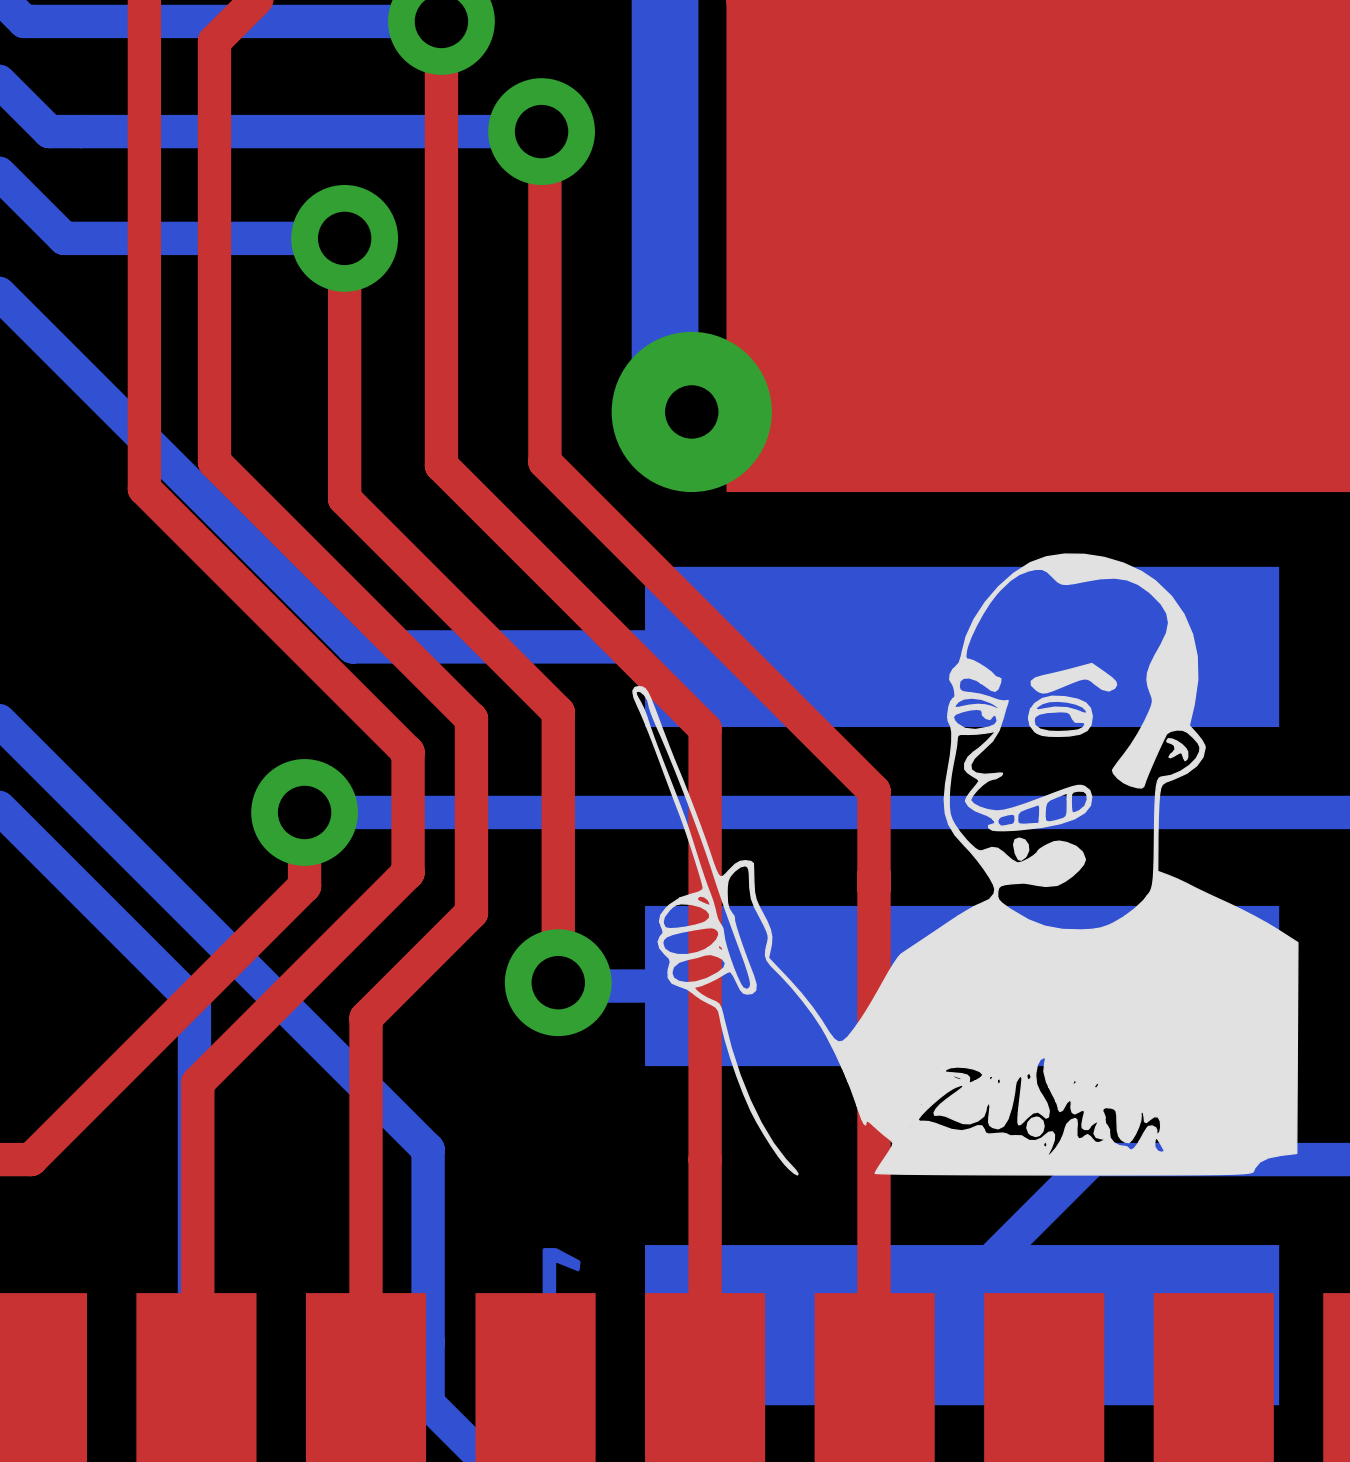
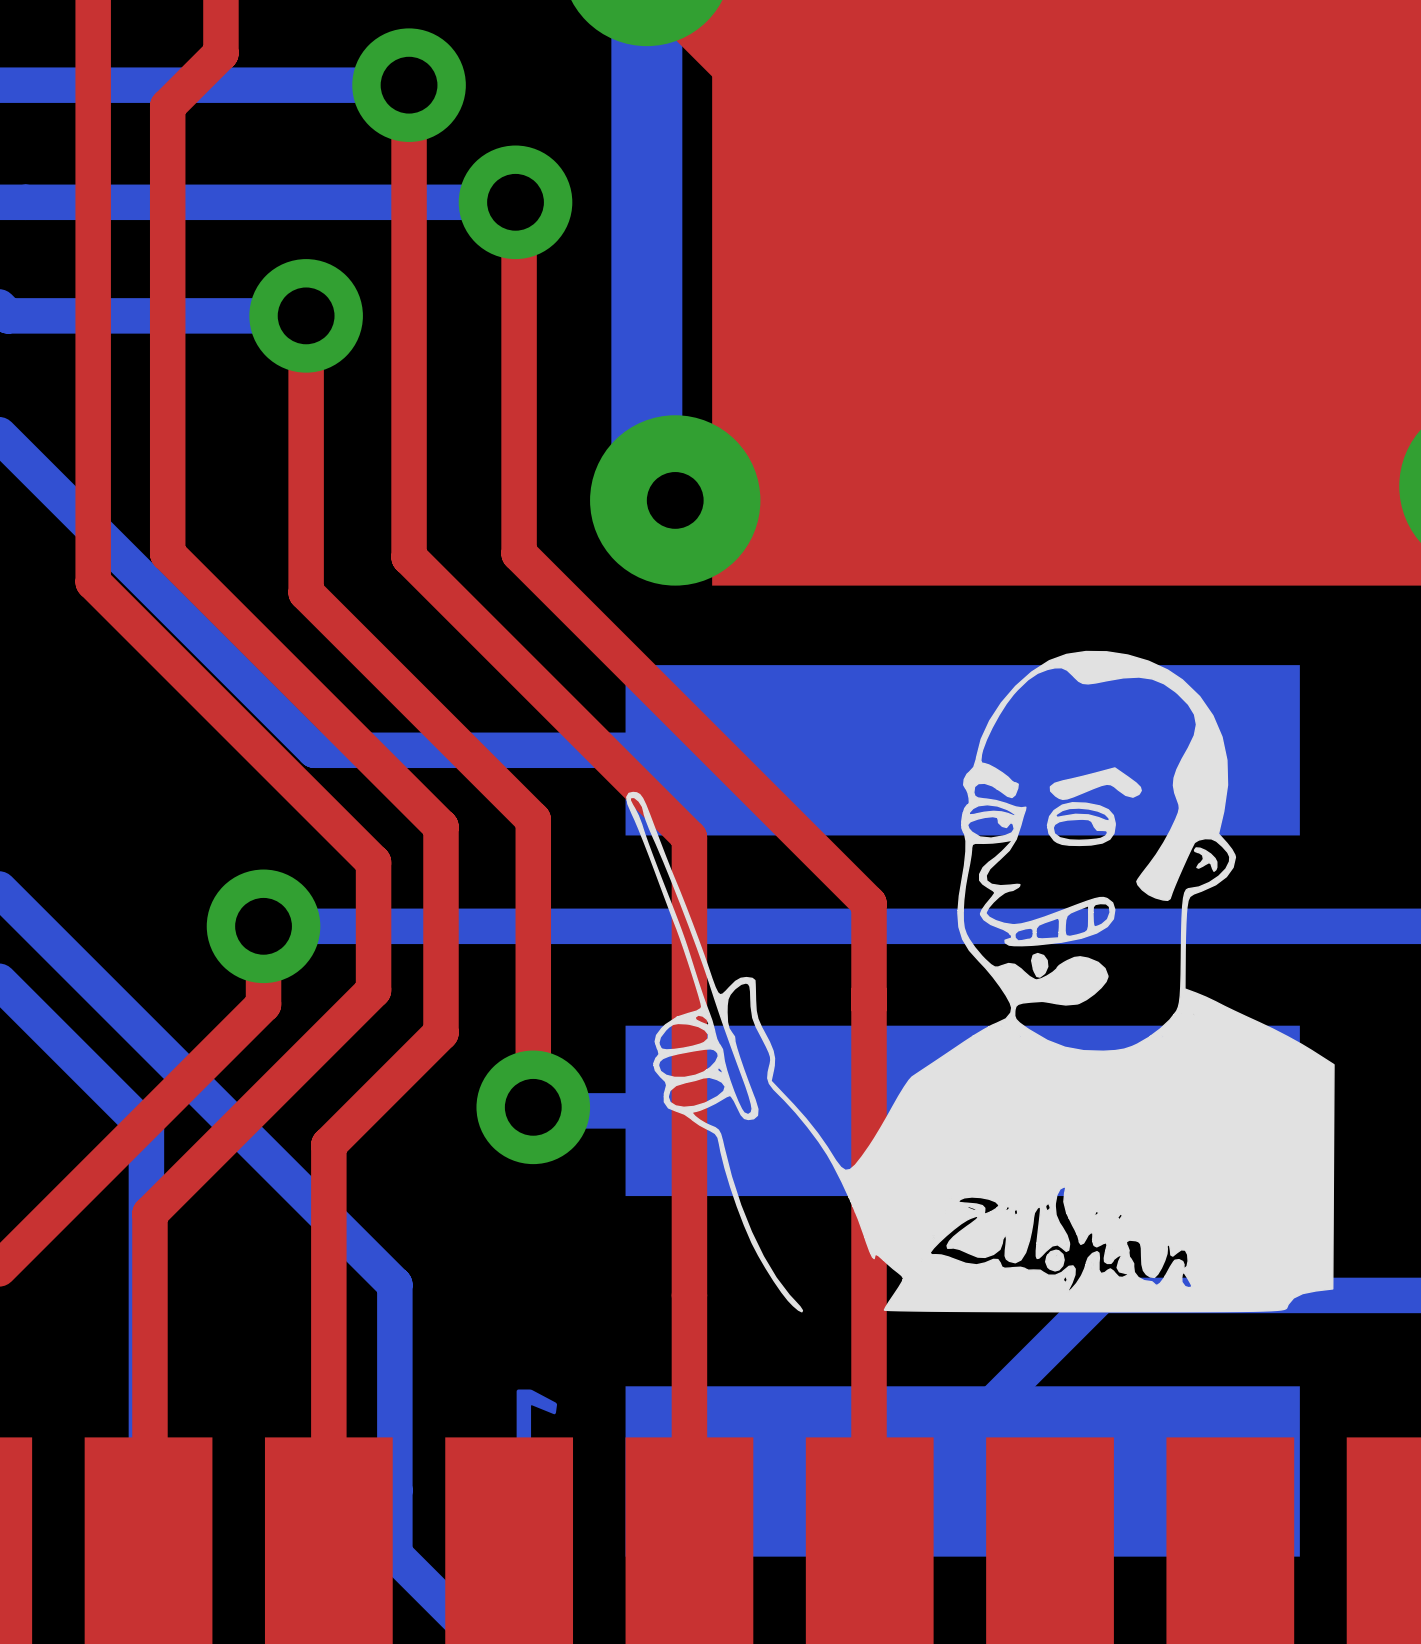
drawing position: (965, 864) -> (980, 981)

